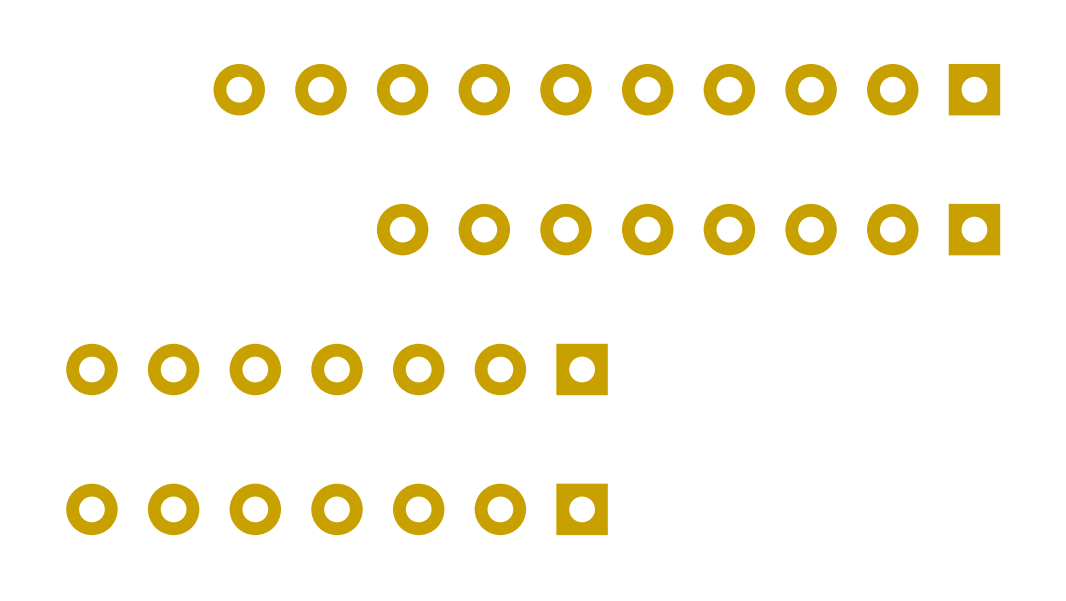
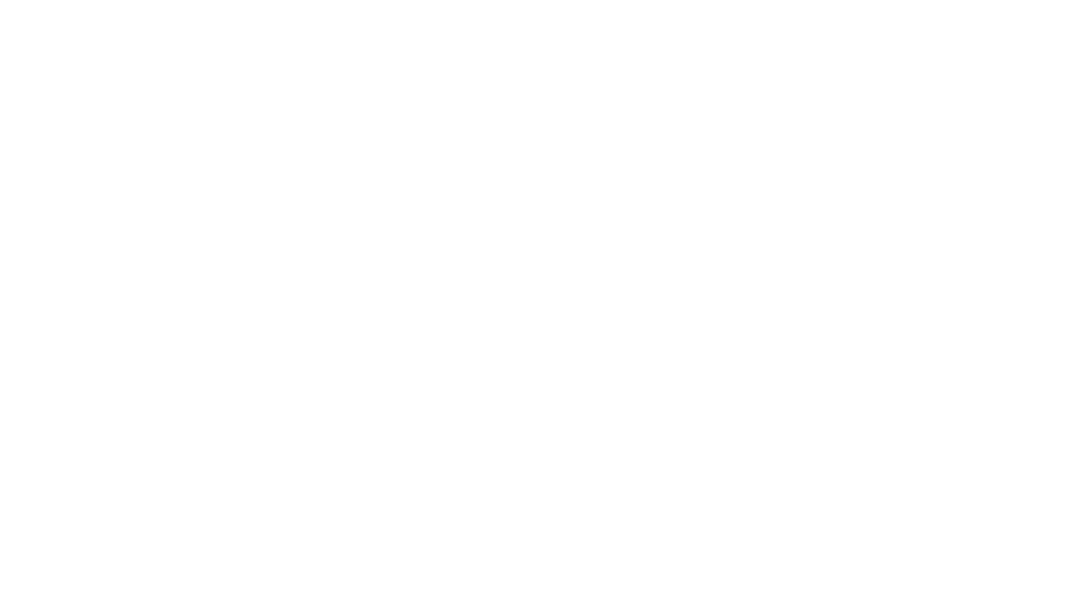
part: (606, 89) -> none
part: (688, 229) -> none
part: (337, 369) -> none
part: (337, 509) -> none

